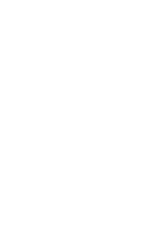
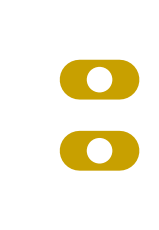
part: none -> (99, 115)

